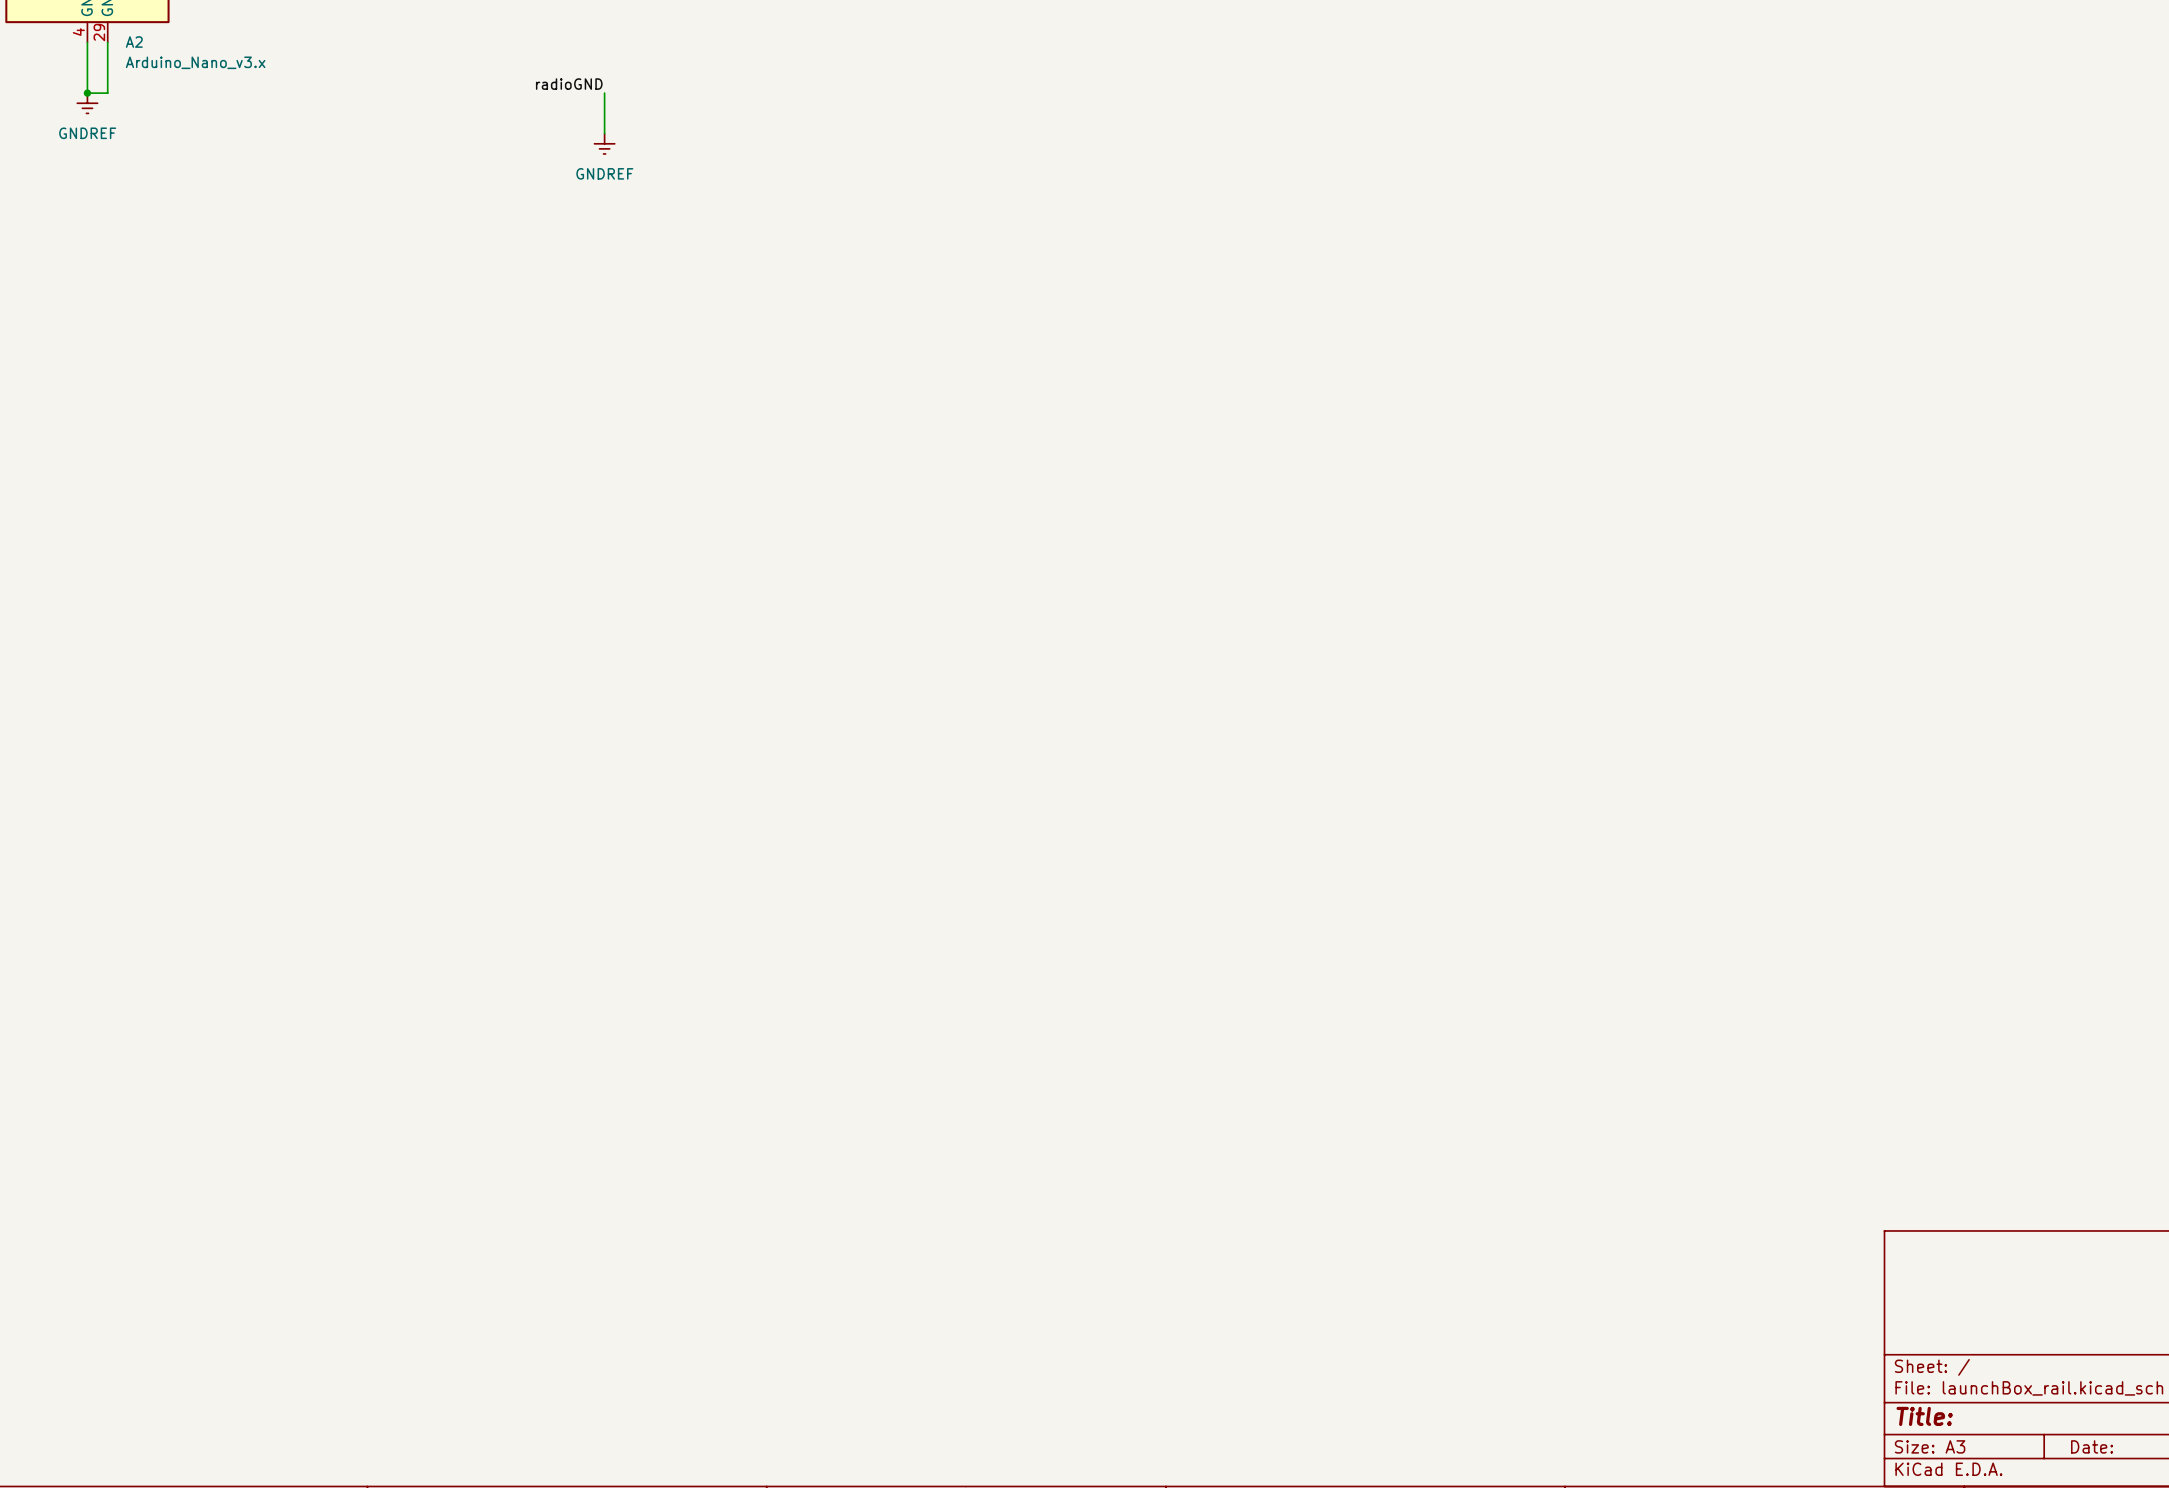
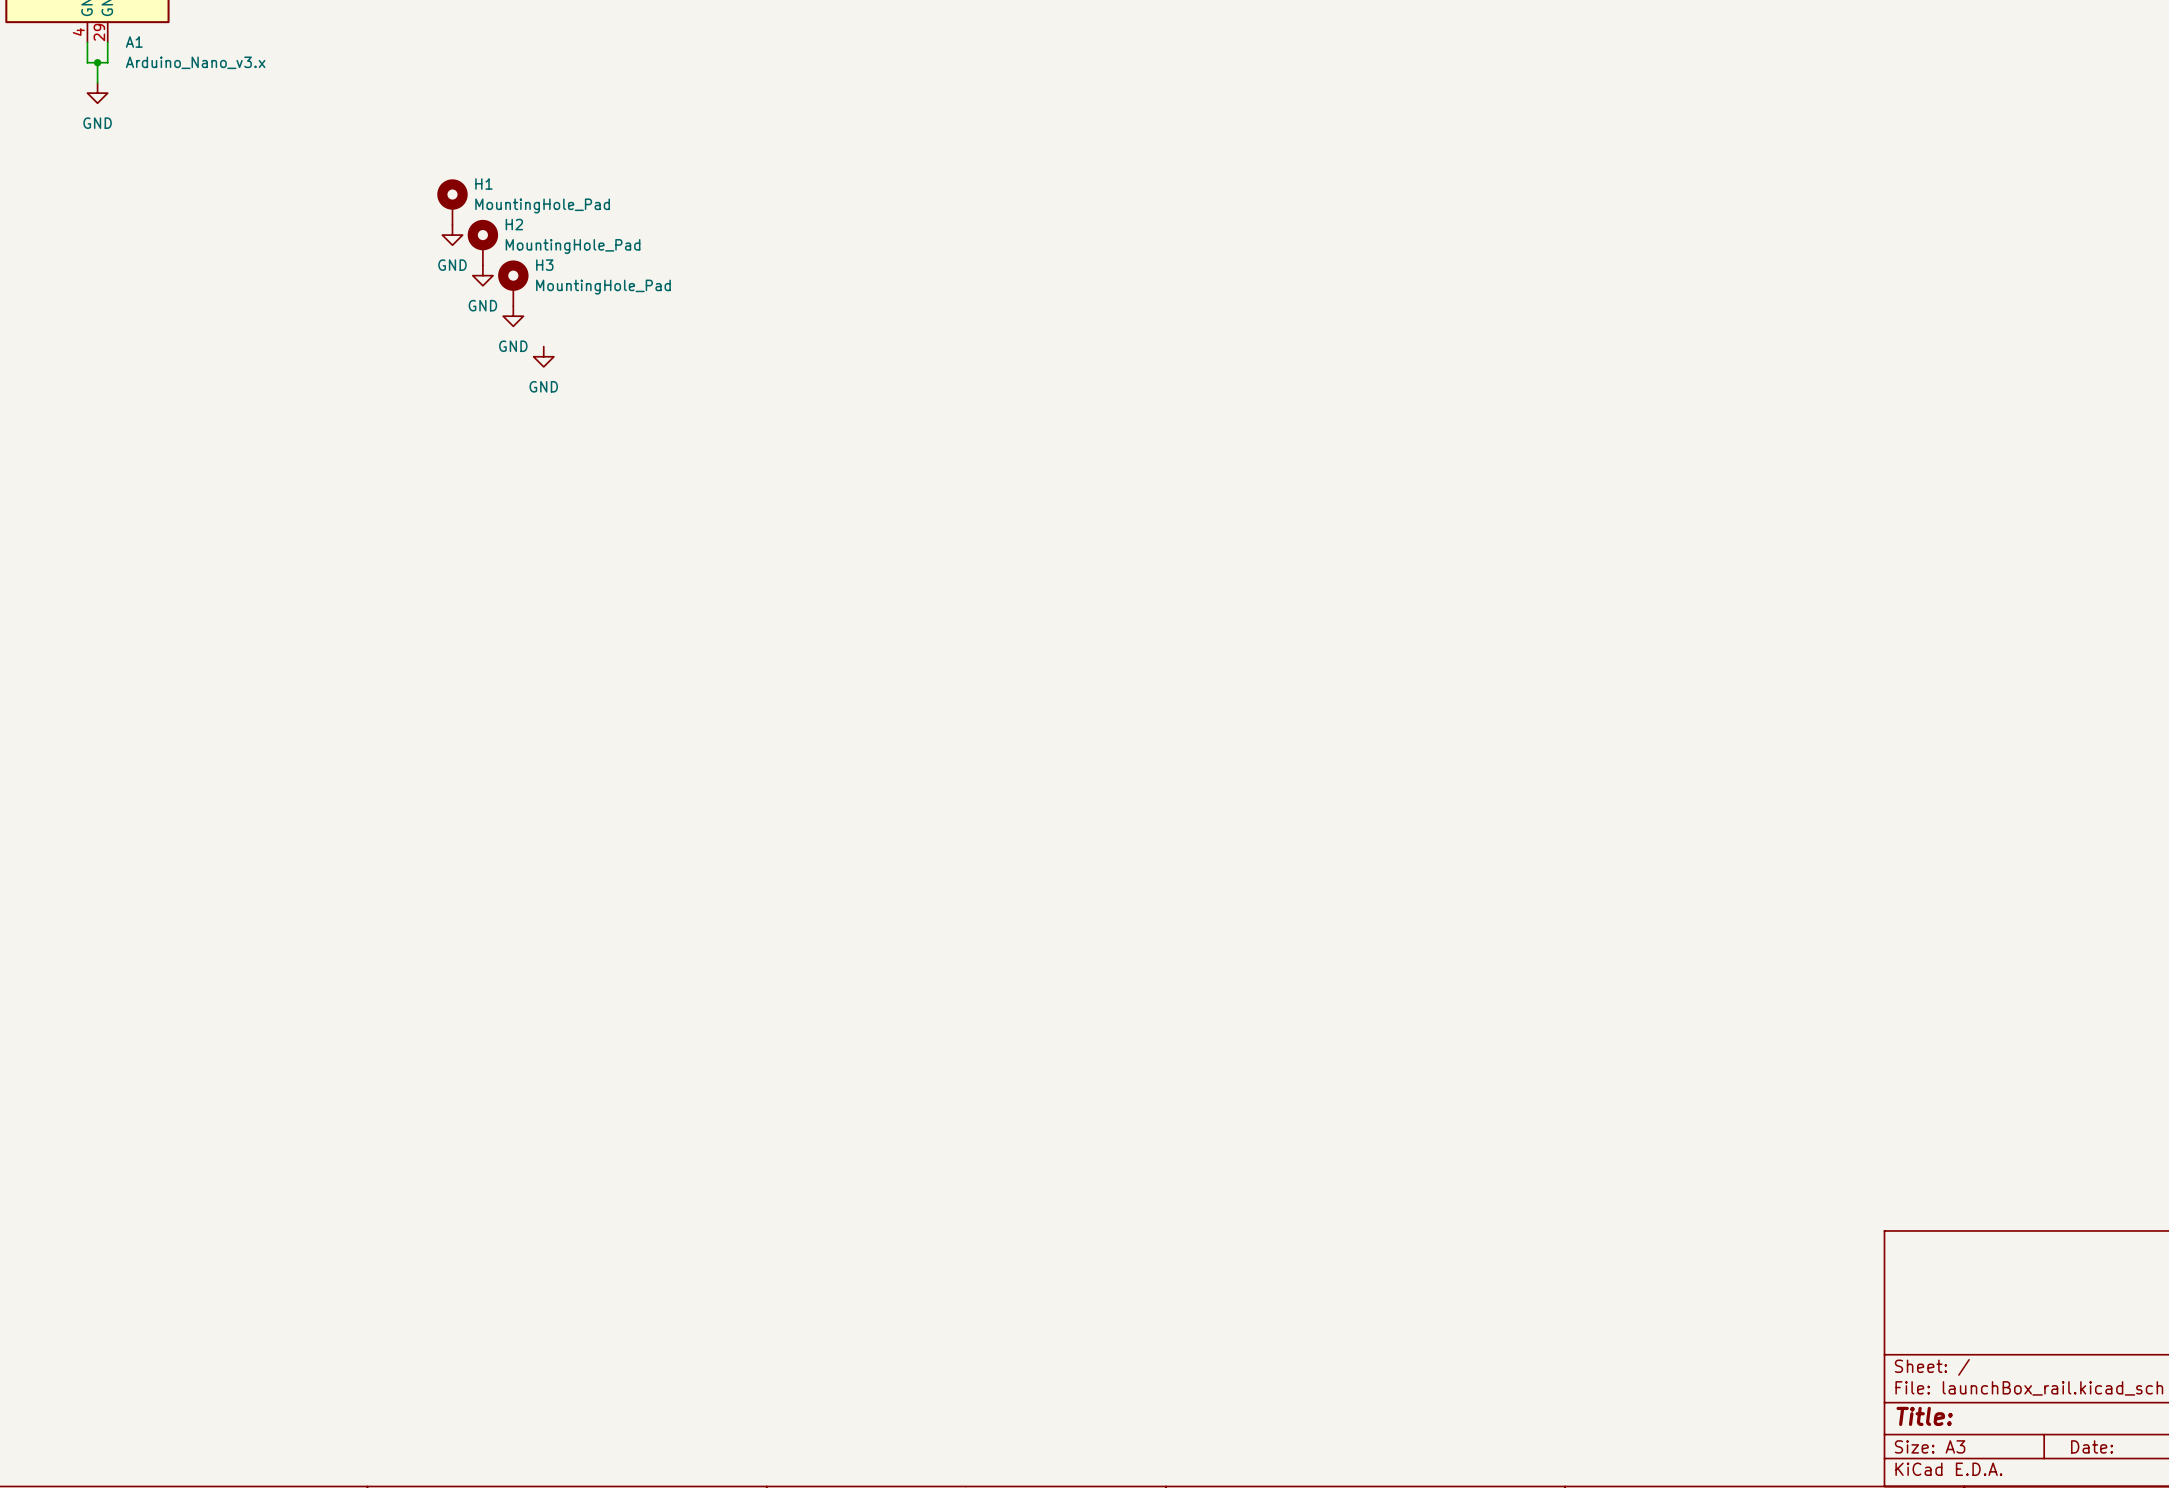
A2 name: A2 (134, 42) -> A1 (134, 42)
wire: (87, 62) (87, 93) (107, 93) (107, 62) -> (87, 62) (107, 62)
wire: none -> (97, 62) (97, 82)
label: radioGND (569, 84) -> none
junction position: (87, 93) -> (97, 62)
power symbol: none -> GND (97, 93)
wire: (604, 93) (604, 133) -> none
power symbol: GNDREF (87, 103) -> none
power symbol: GNDREF (604, 143) -> none
H1: none -> MountingHole_Pad (452, 202)
power symbol: none -> GND (452, 235)
H2: none -> MountingHole_Pad (482, 242)
power symbol: none -> GND (482, 275)
H3: none -> MountingHole_Pad (513, 283)
power symbol: none -> GND (513, 316)
power symbol: none -> GND (543, 356)

